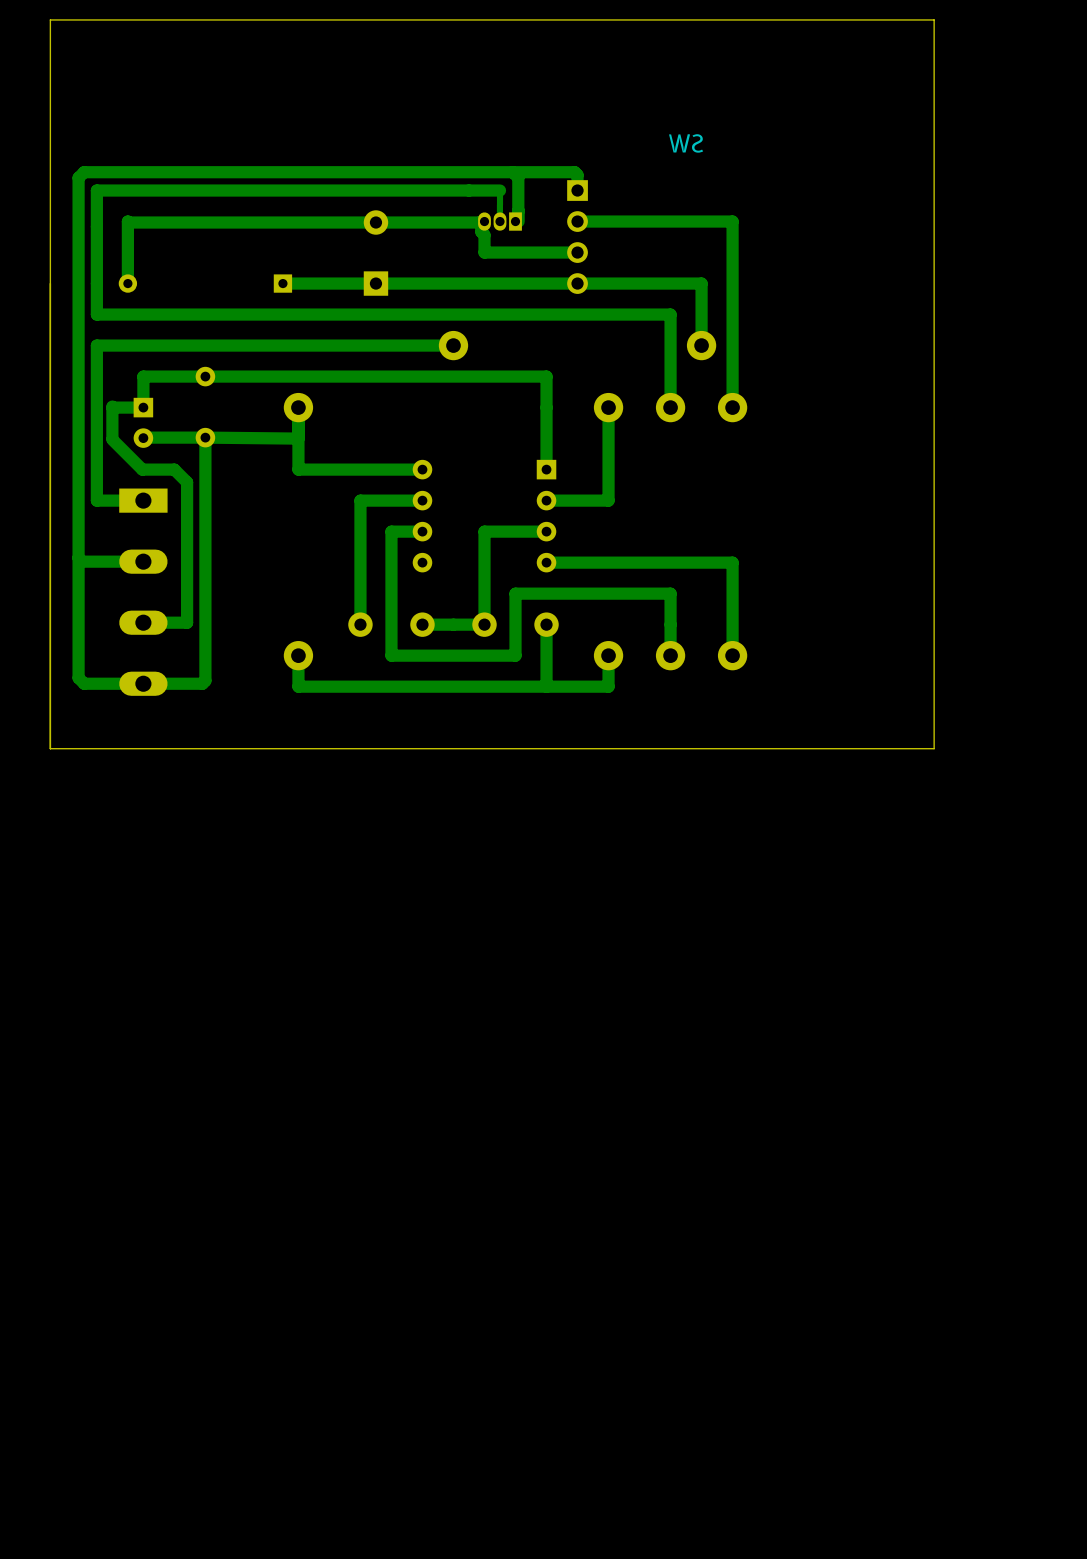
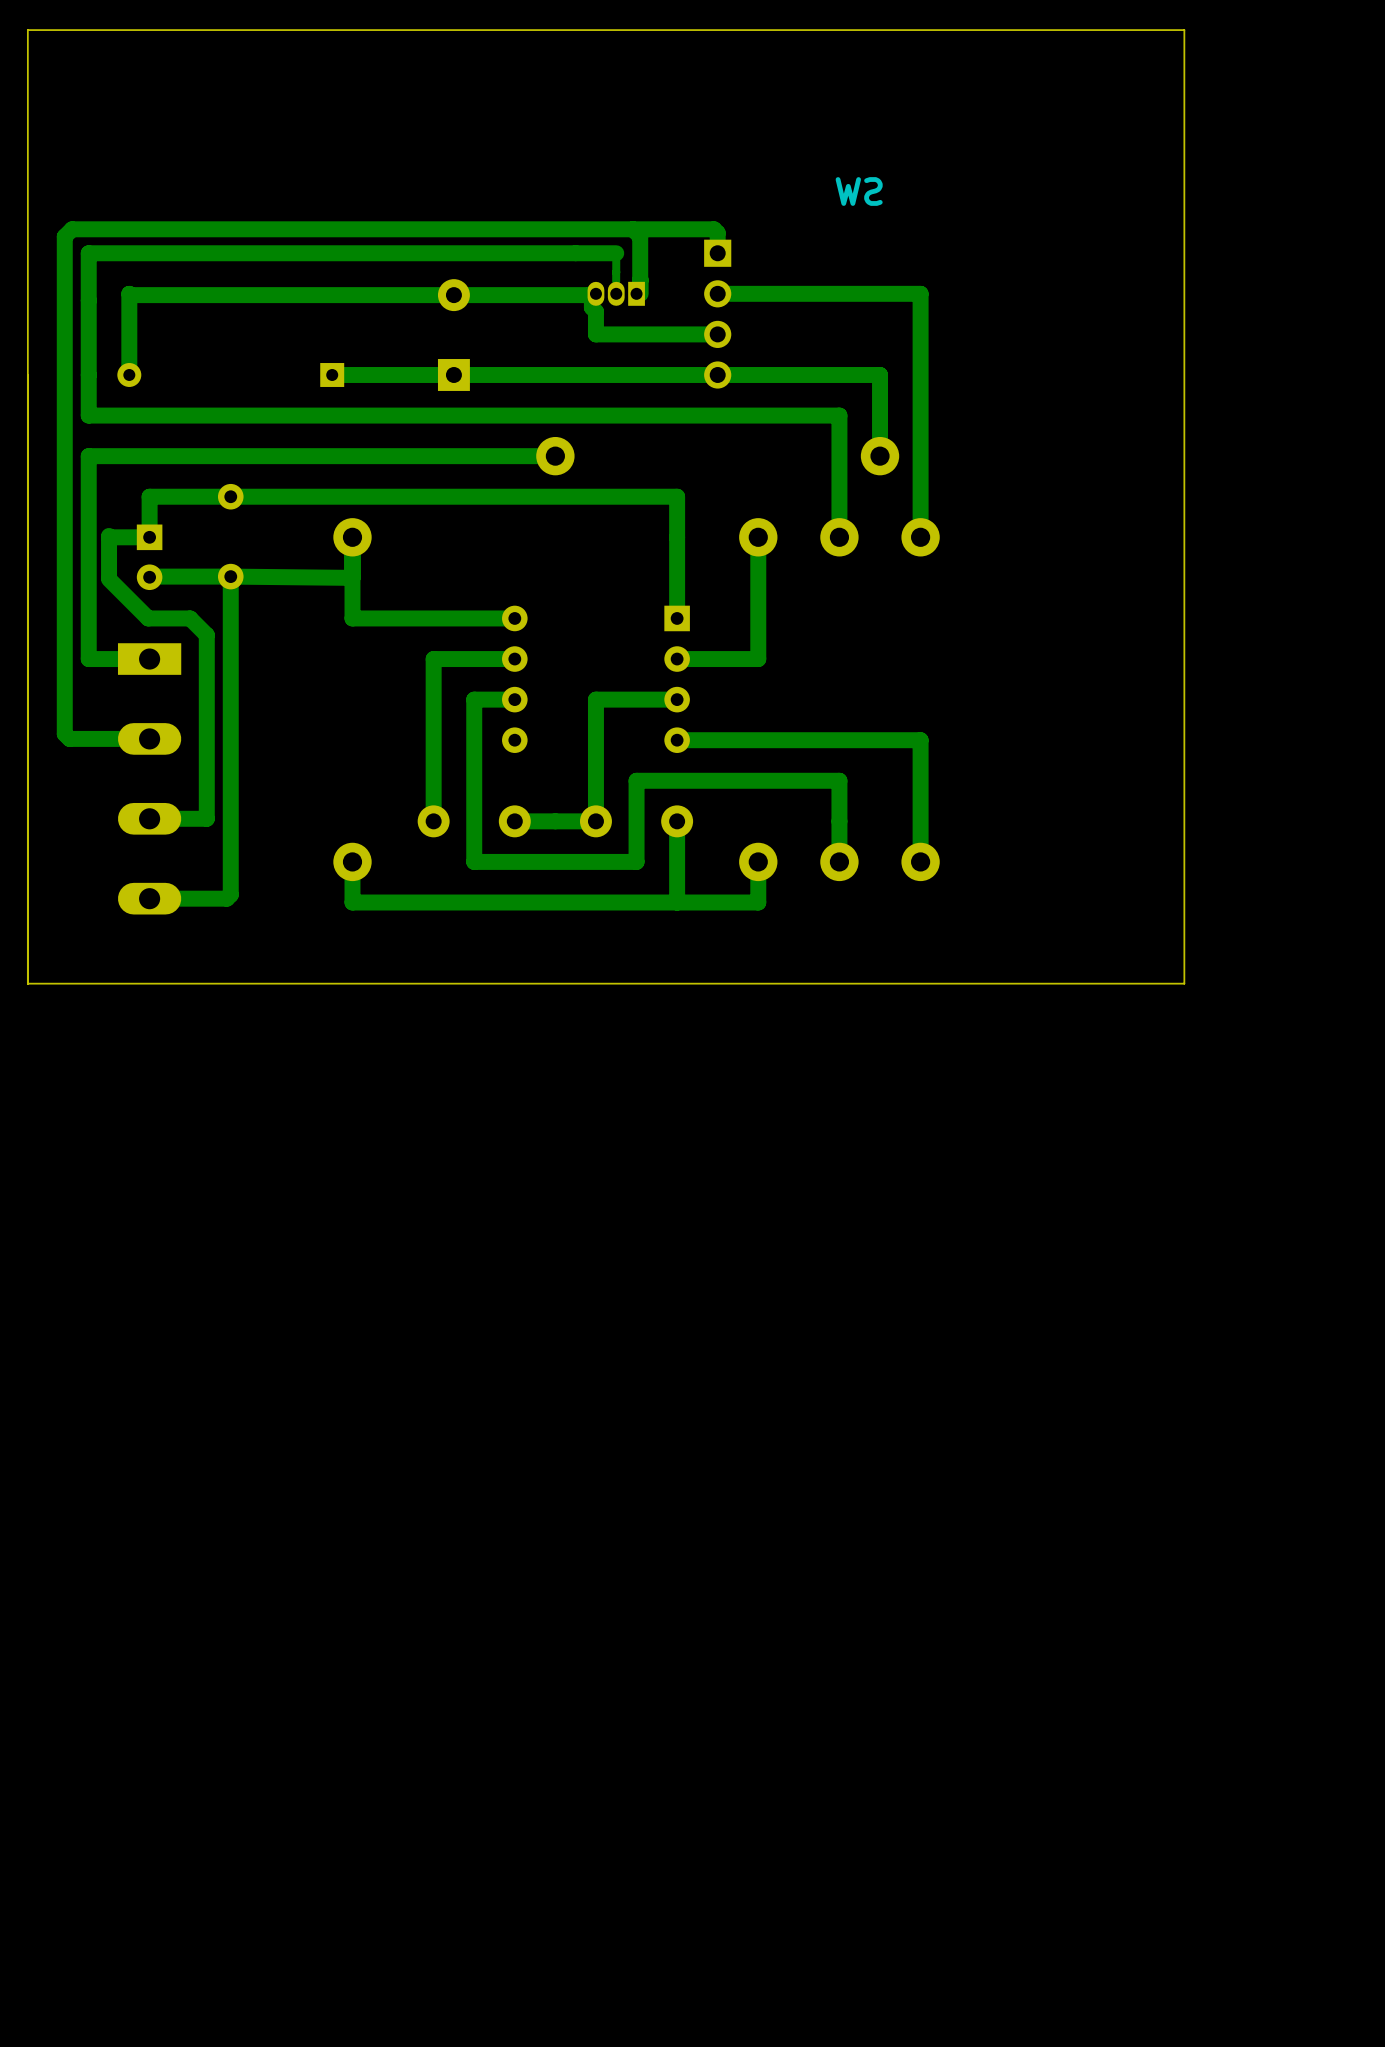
bottom track: (78, 557) (78, 678) (84, 683) (143, 683) -> none

